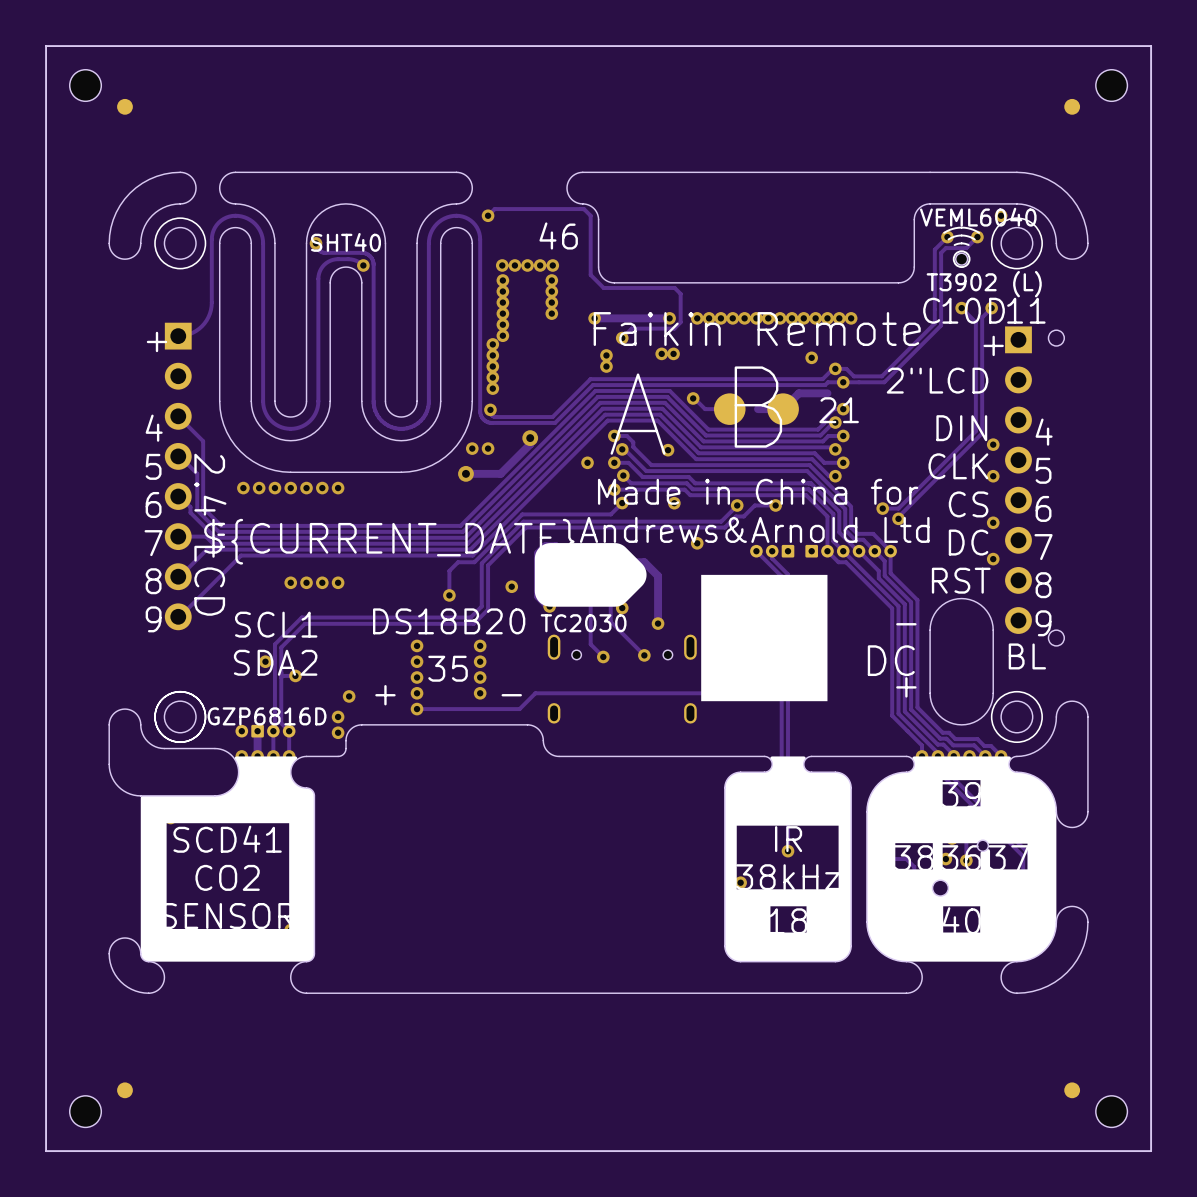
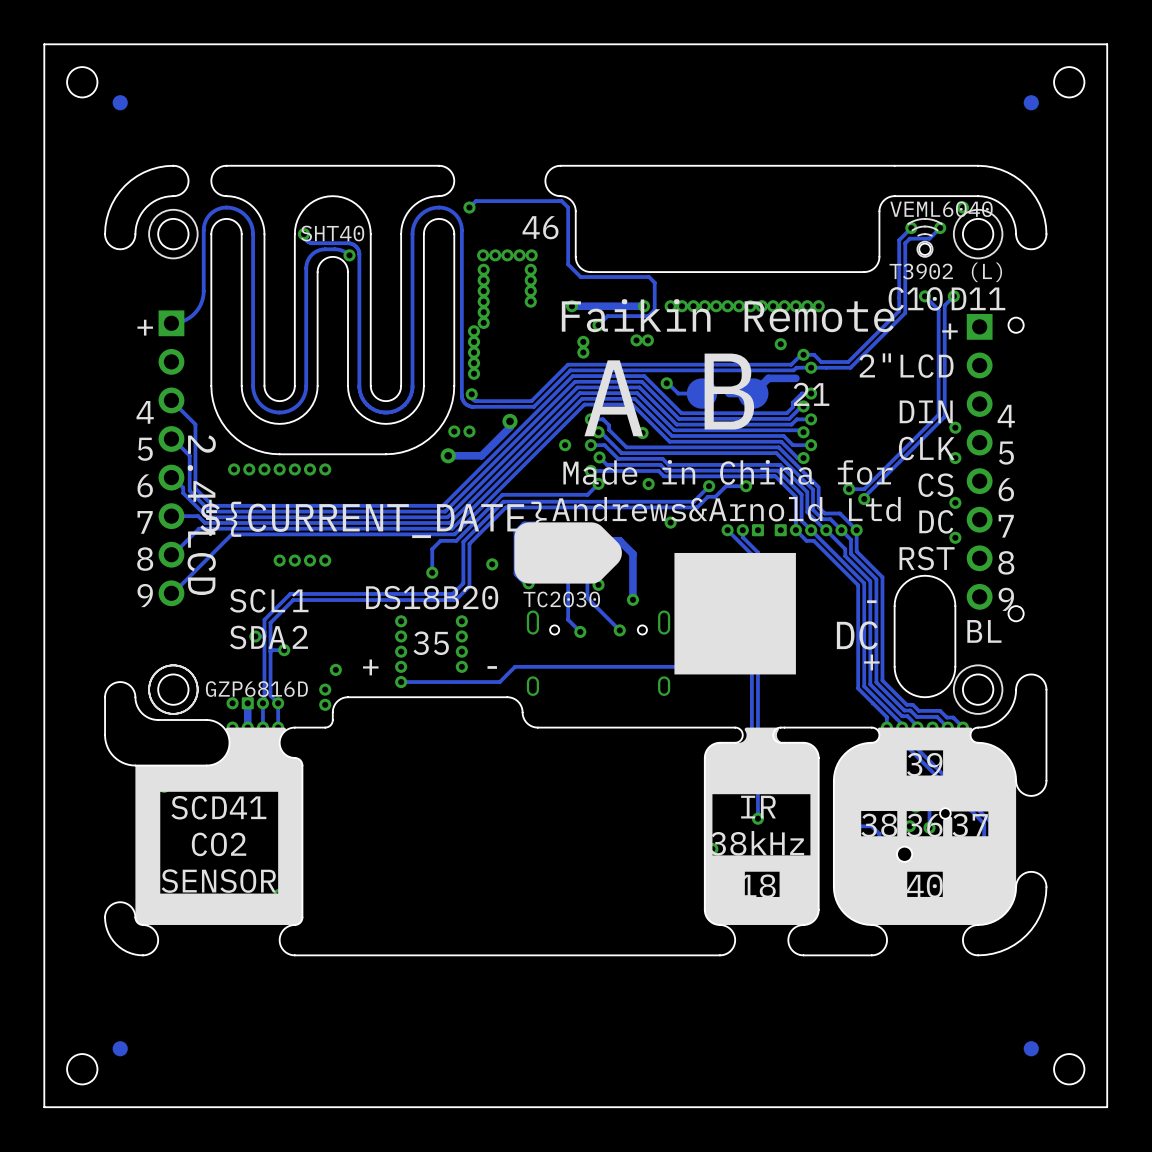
drawing shape: [724, 756, 852, 962] -> [704, 727, 819, 925]
board edge: (748, 772) (732, 774) (727, 779) (724, 786) (724, 945) (726, 952) (730, 958) (738, 961) (835, 961) -> (720, 742) (709, 747) (704, 757) (704, 911) (710, 921) (729, 928) (735, 938) (734, 945) (730, 950) (720, 955)
board edge: (835, 993) (748, 993) -> (803, 955) (792, 950) (788, 940) (792, 929) (803, 924)

